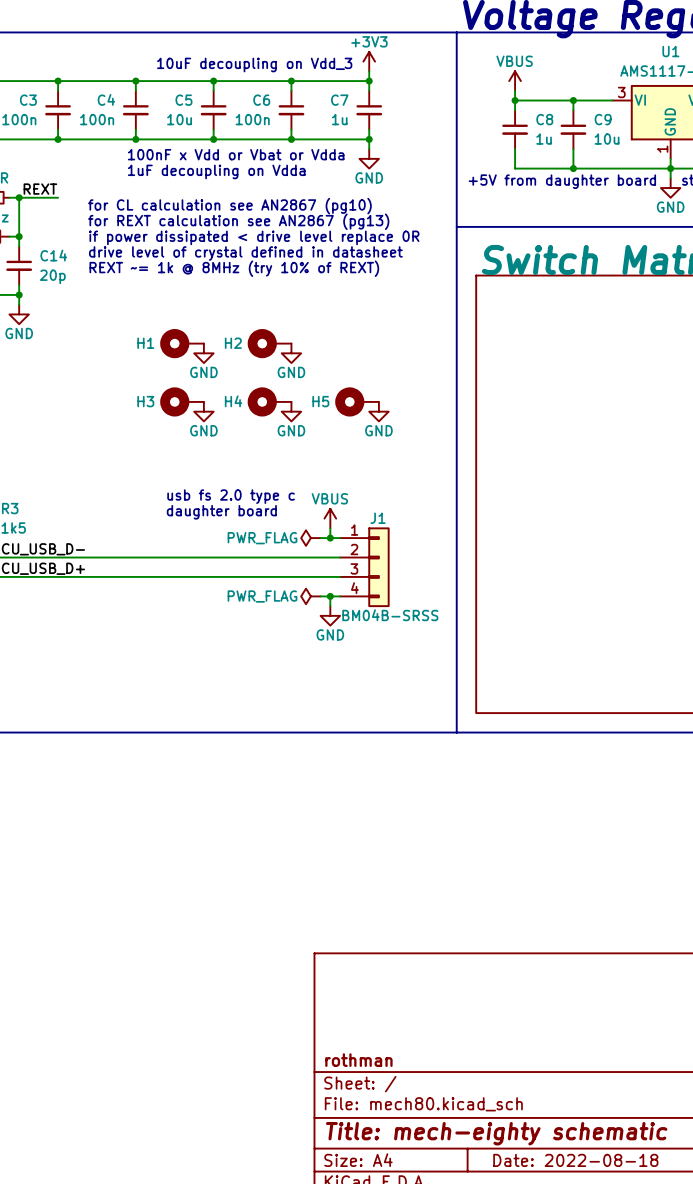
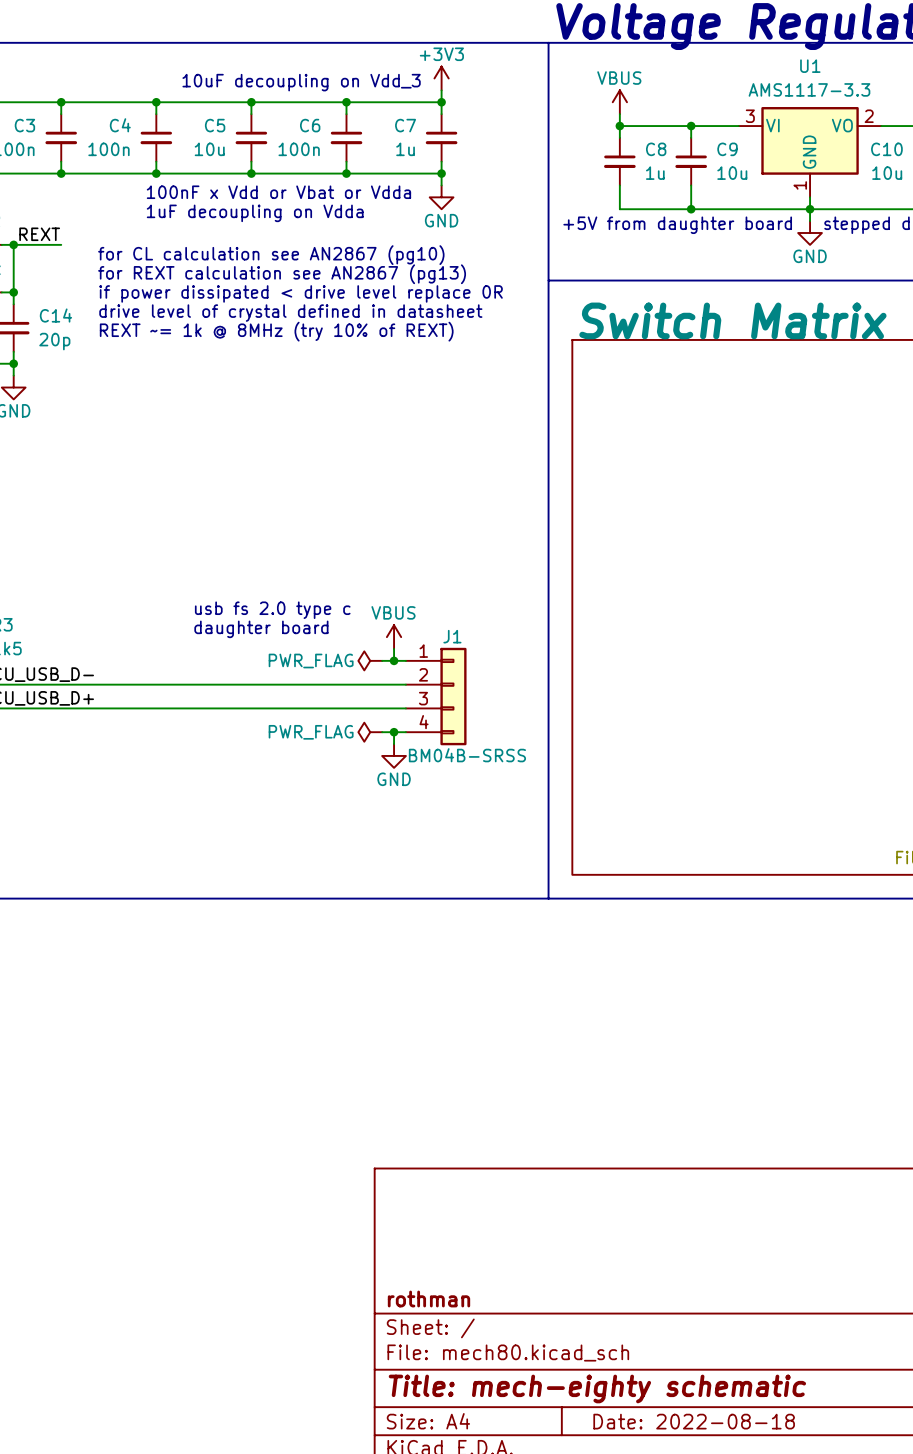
H1: (182, 343) -> none
H2: (269, 343) -> none
power symbol: GND (203, 353) -> none
power symbol: GND (291, 353) -> none
H3: (182, 401) -> none
H4: (269, 401) -> none
H5: (357, 401) -> none
power symbol: GND (203, 411) -> none
power symbol: GND (291, 411) -> none
power symbol: GND (378, 411) -> none

